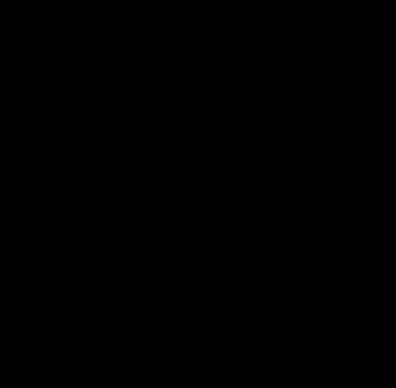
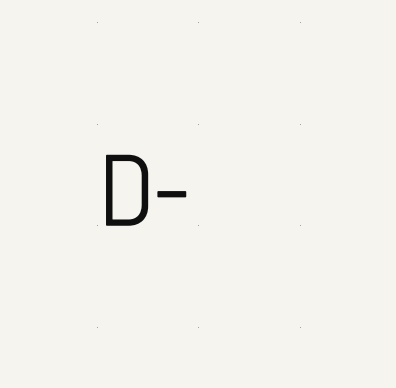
label: none -> D- (146, 190)

